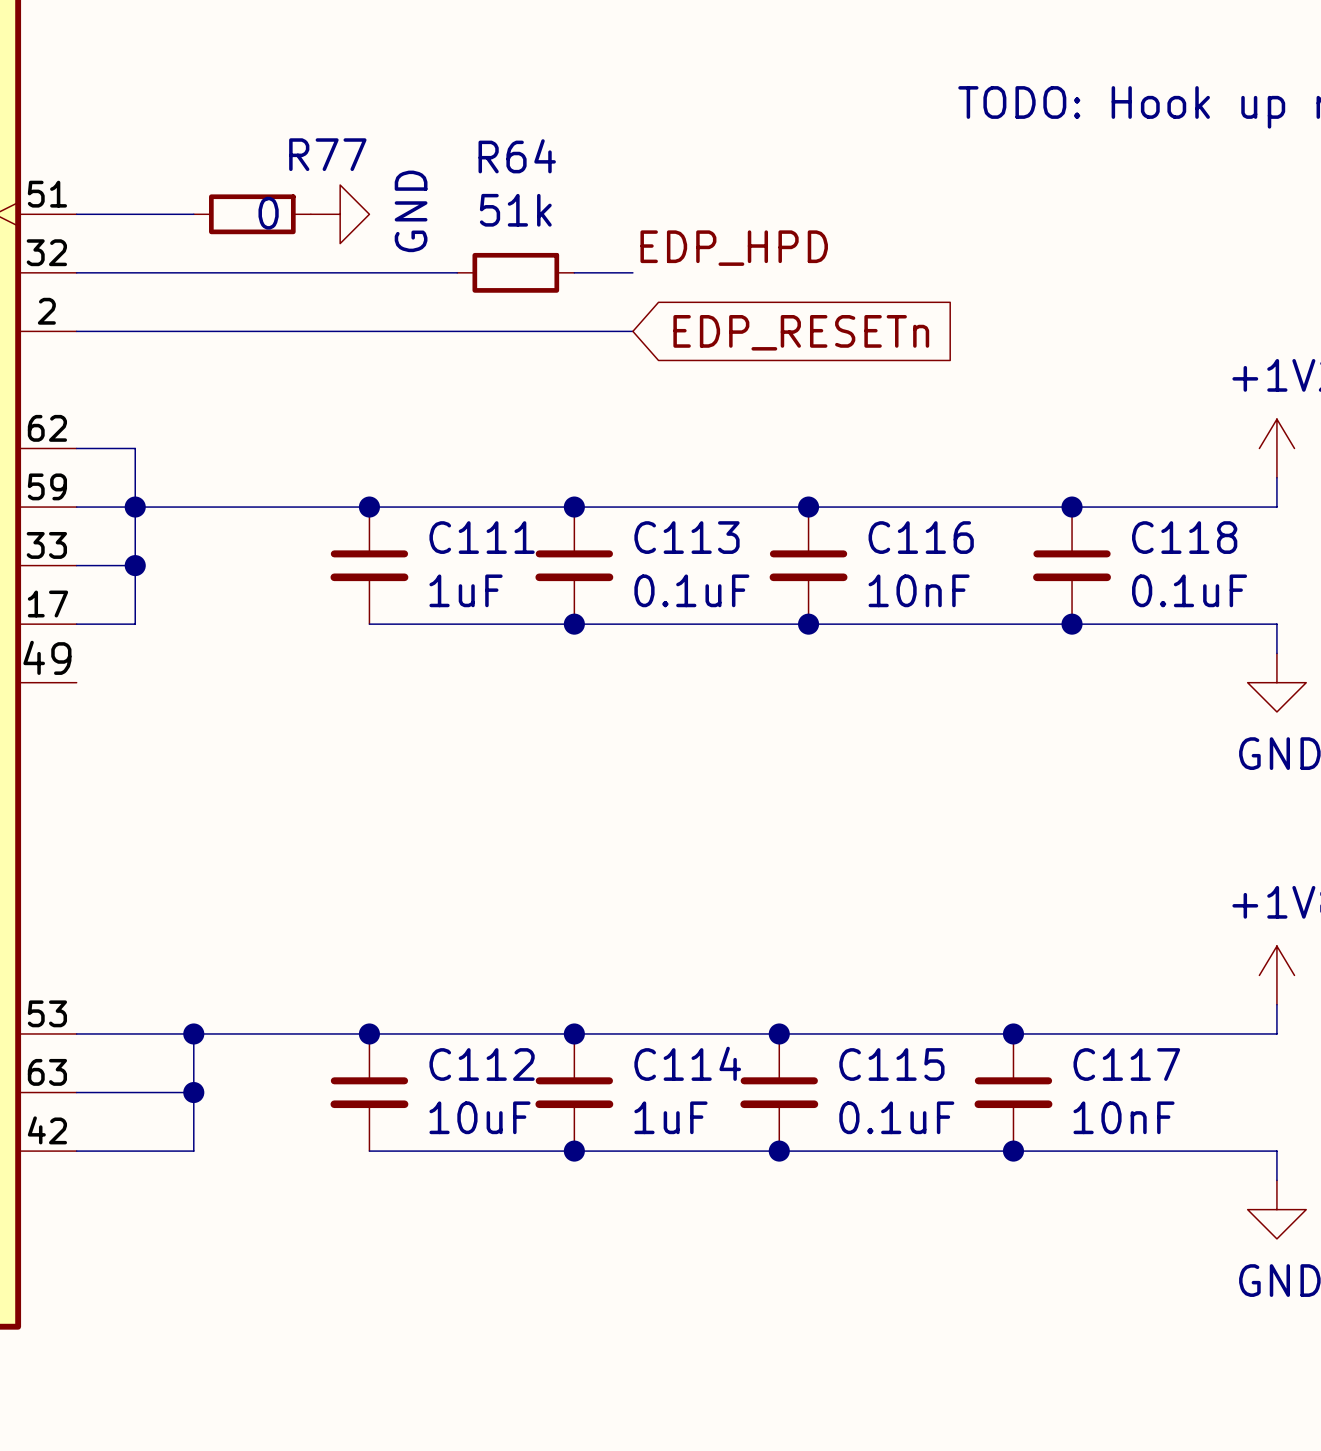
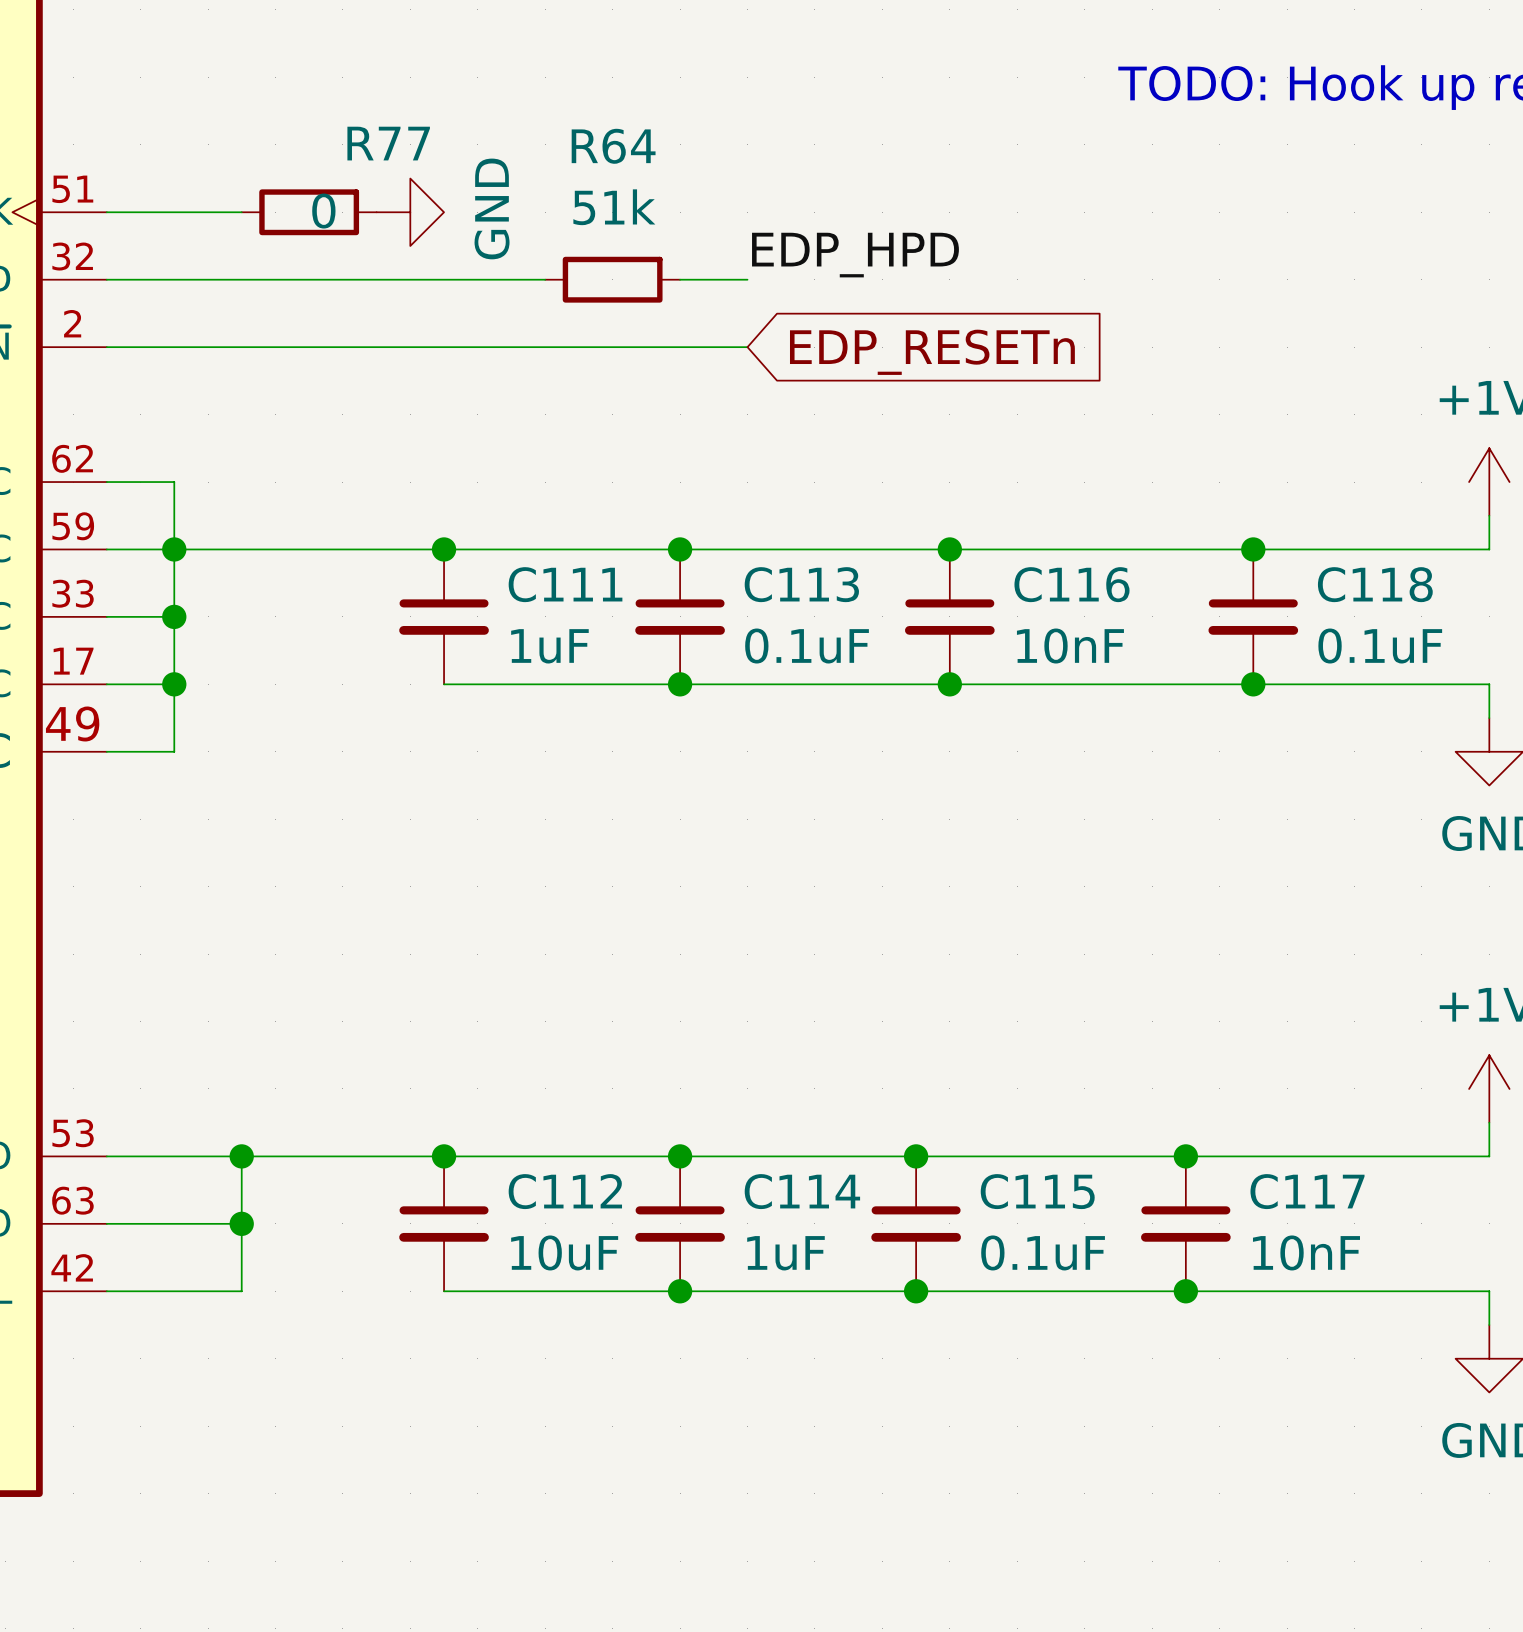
wire: none -> (174, 684) (174, 751) (106, 751)
junction: none -> (174, 684)

